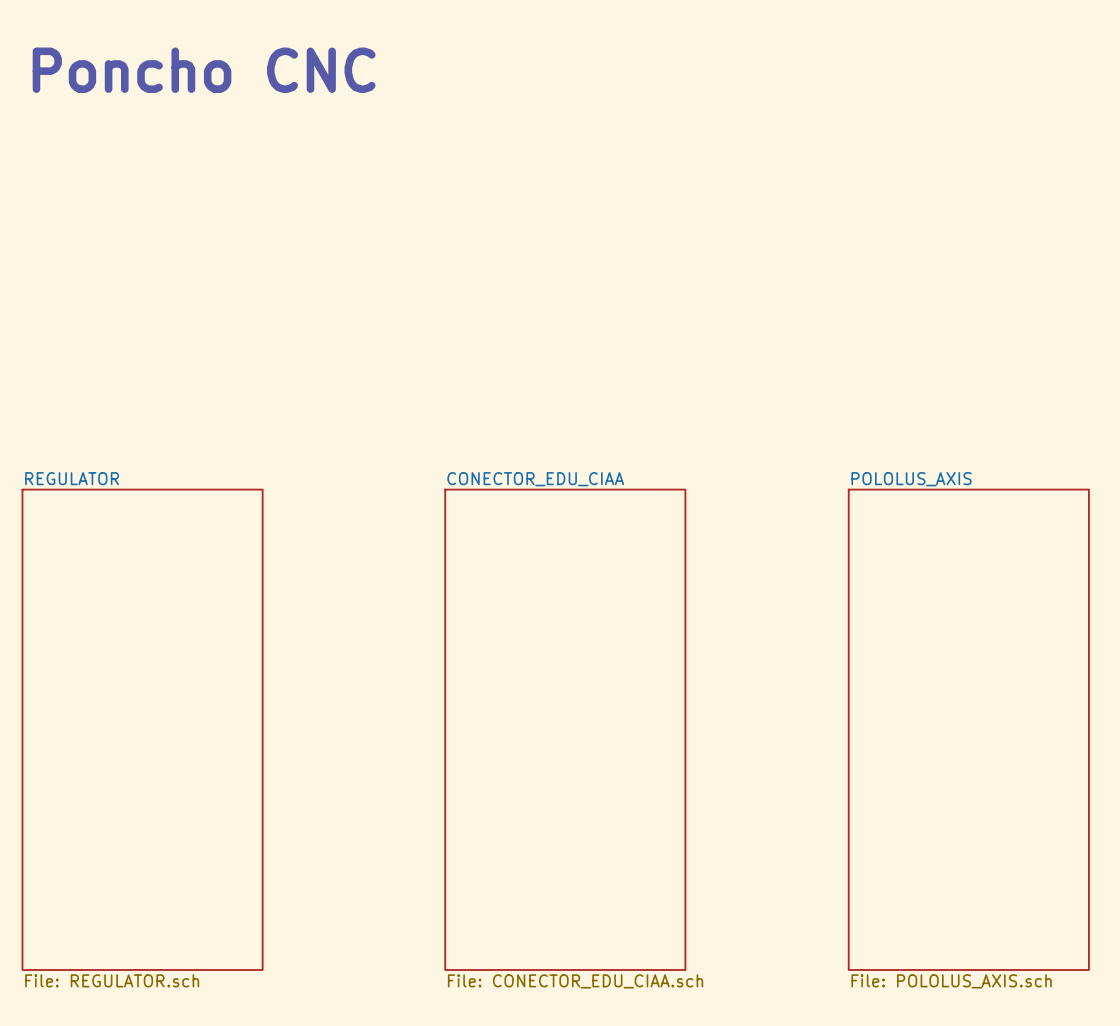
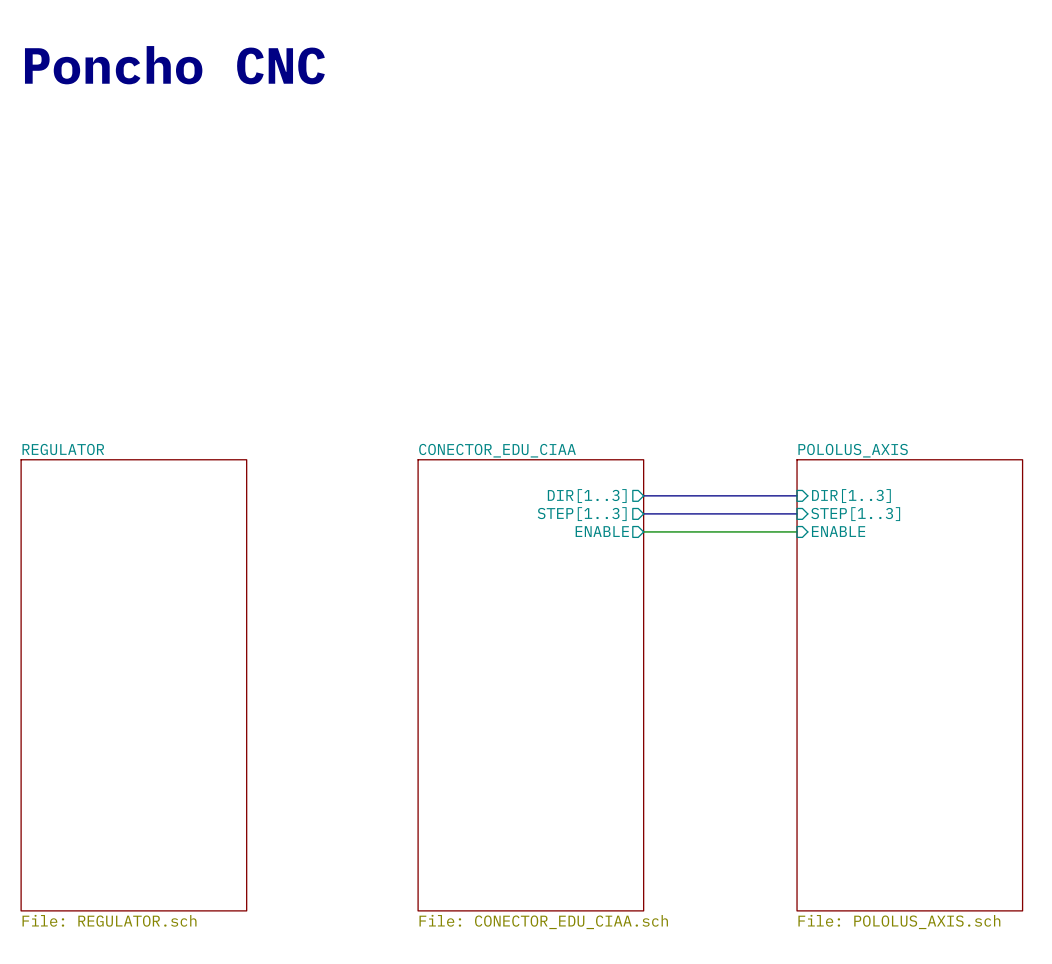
sheet pin: none -> DIR[1..3] (587, 496)
bus: none -> (643, 495) (797, 495)
sheet pin: none -> DIR[1..3] (851, 496)
bus: none -> (643, 513) (797, 513)
sheet pin: none -> STEP[1..3] (582, 514)
sheet pin: none -> STEP[1..3] (855, 514)
sheet pin: none -> ENABLE (602, 531)
wire: none -> (643, 531) (797, 531)
sheet pin: none -> ENABLE (838, 531)

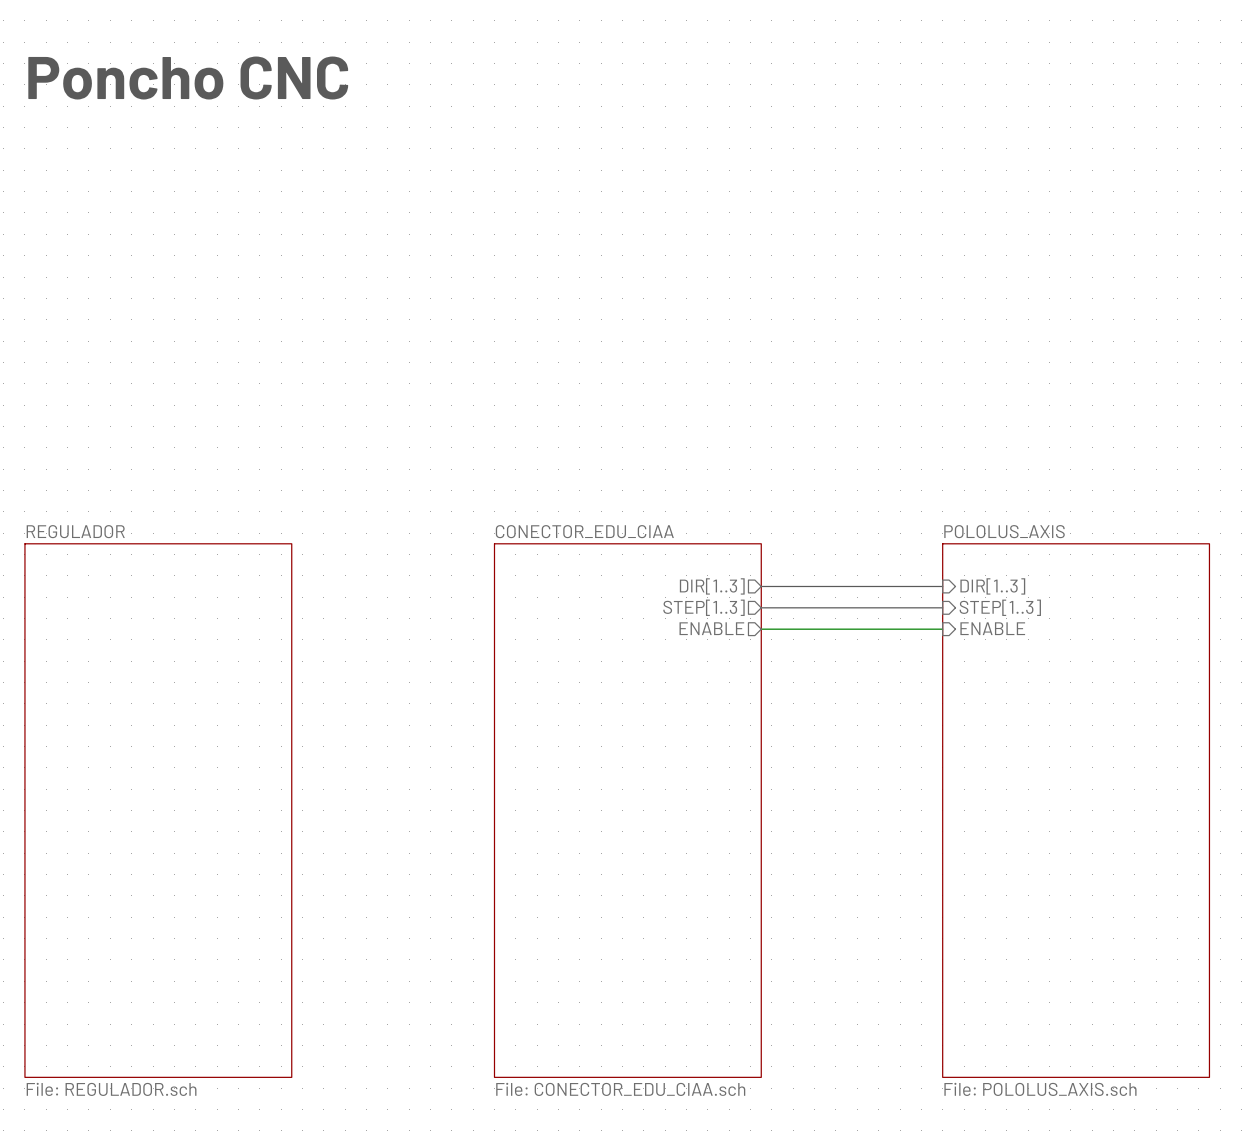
sheet REGULATOR name: REGULATOR (63, 449) -> REGULADOR (75, 531)
sheet REGULATOR value: File: REGULATOR.sch (109, 920) -> File: REGULADOR.sch (111, 1089)

